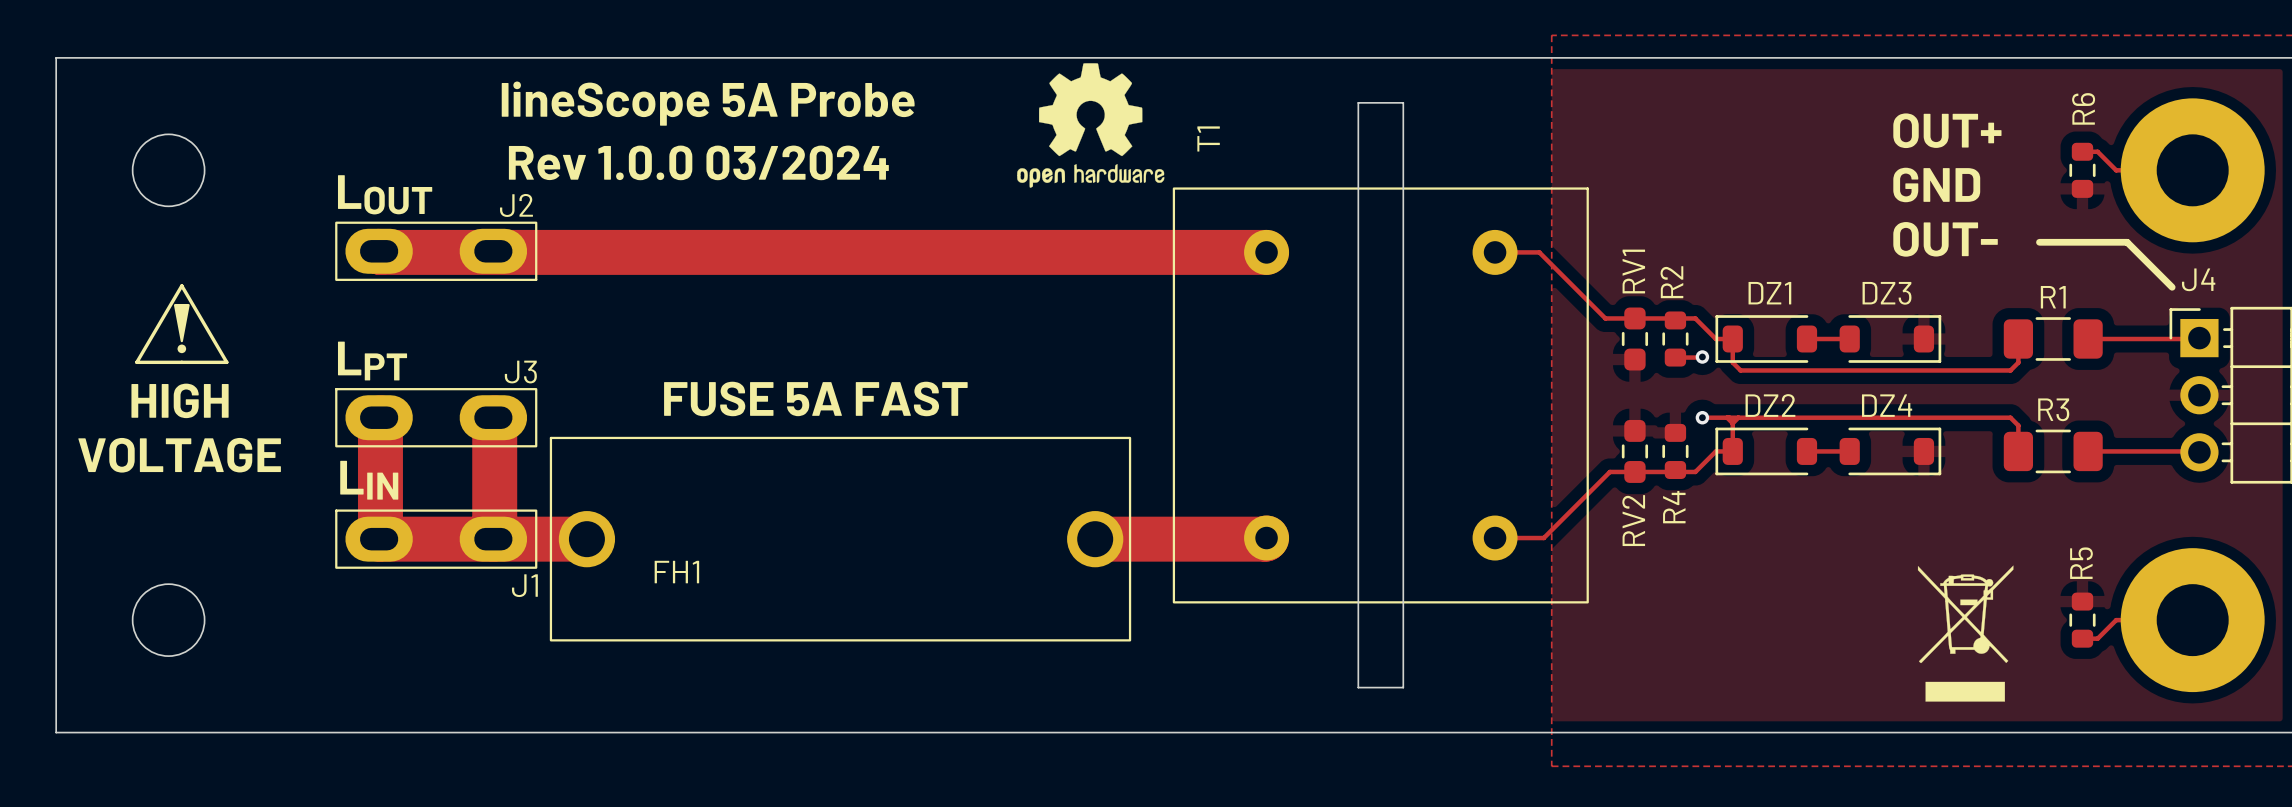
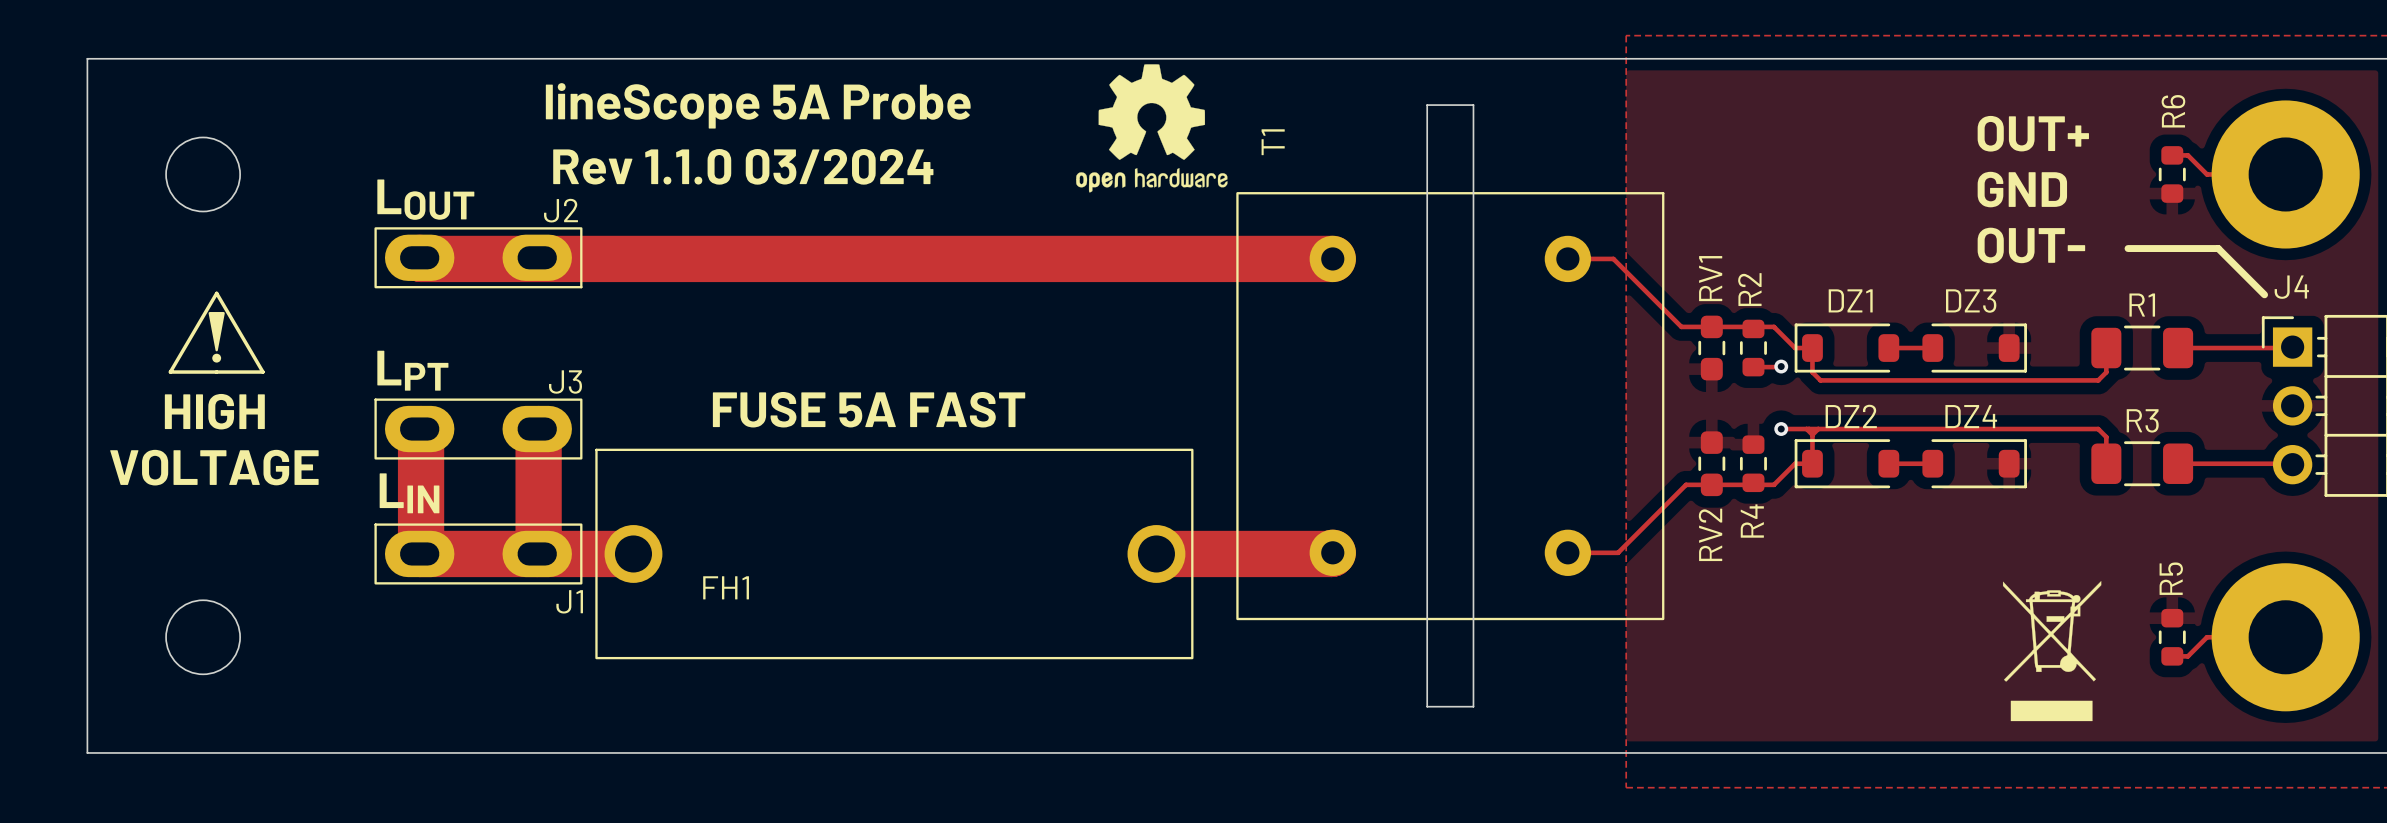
text: Rev 1.0.0 03/2024 (698, 162) -> Rev 1.1.0 03/2024 (743, 166)

